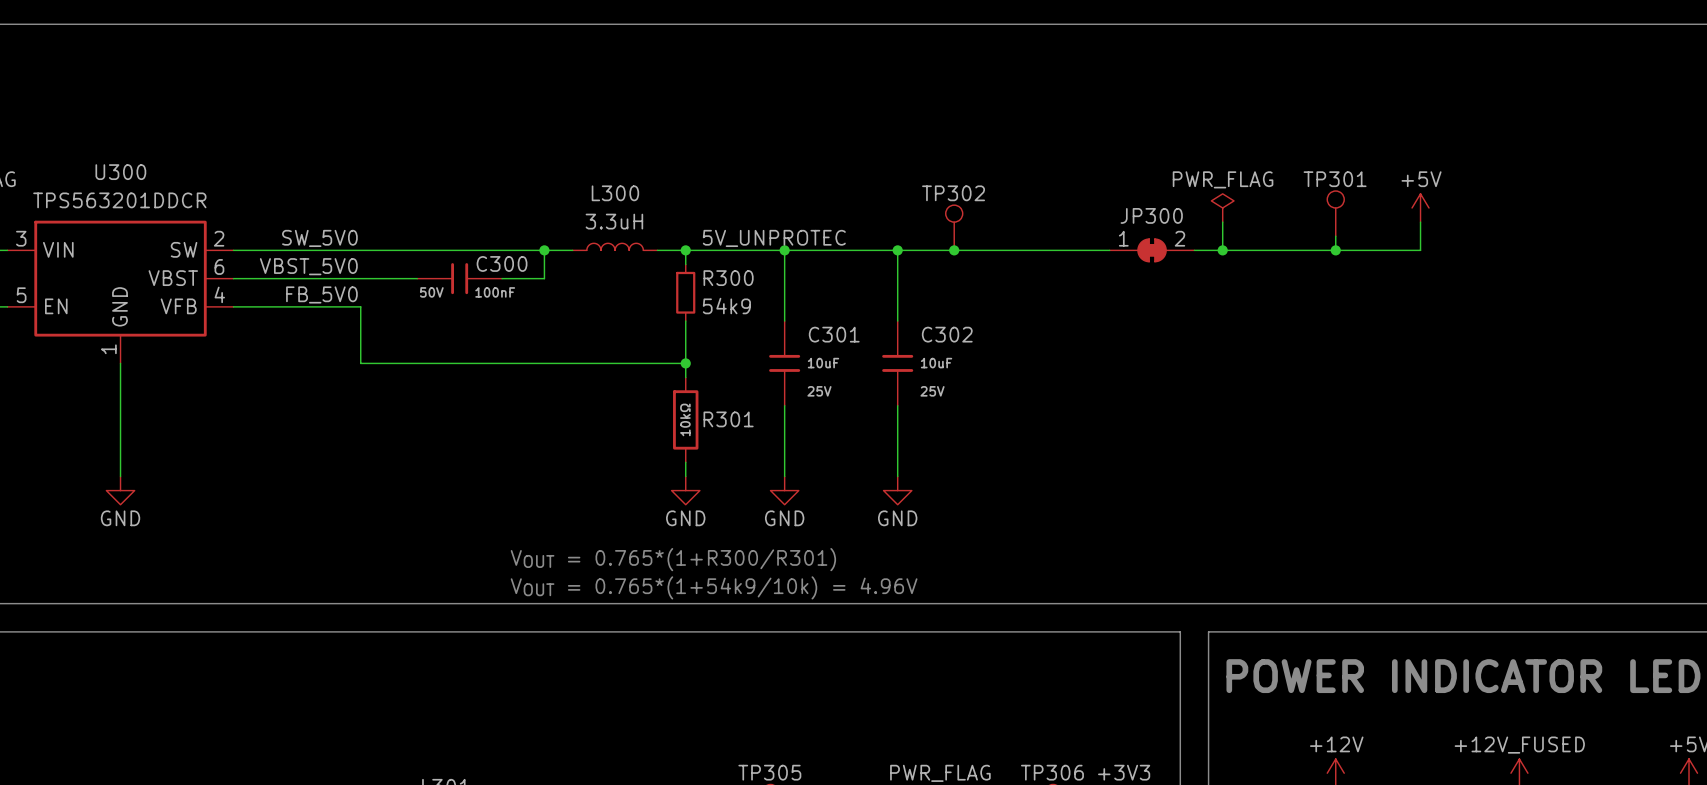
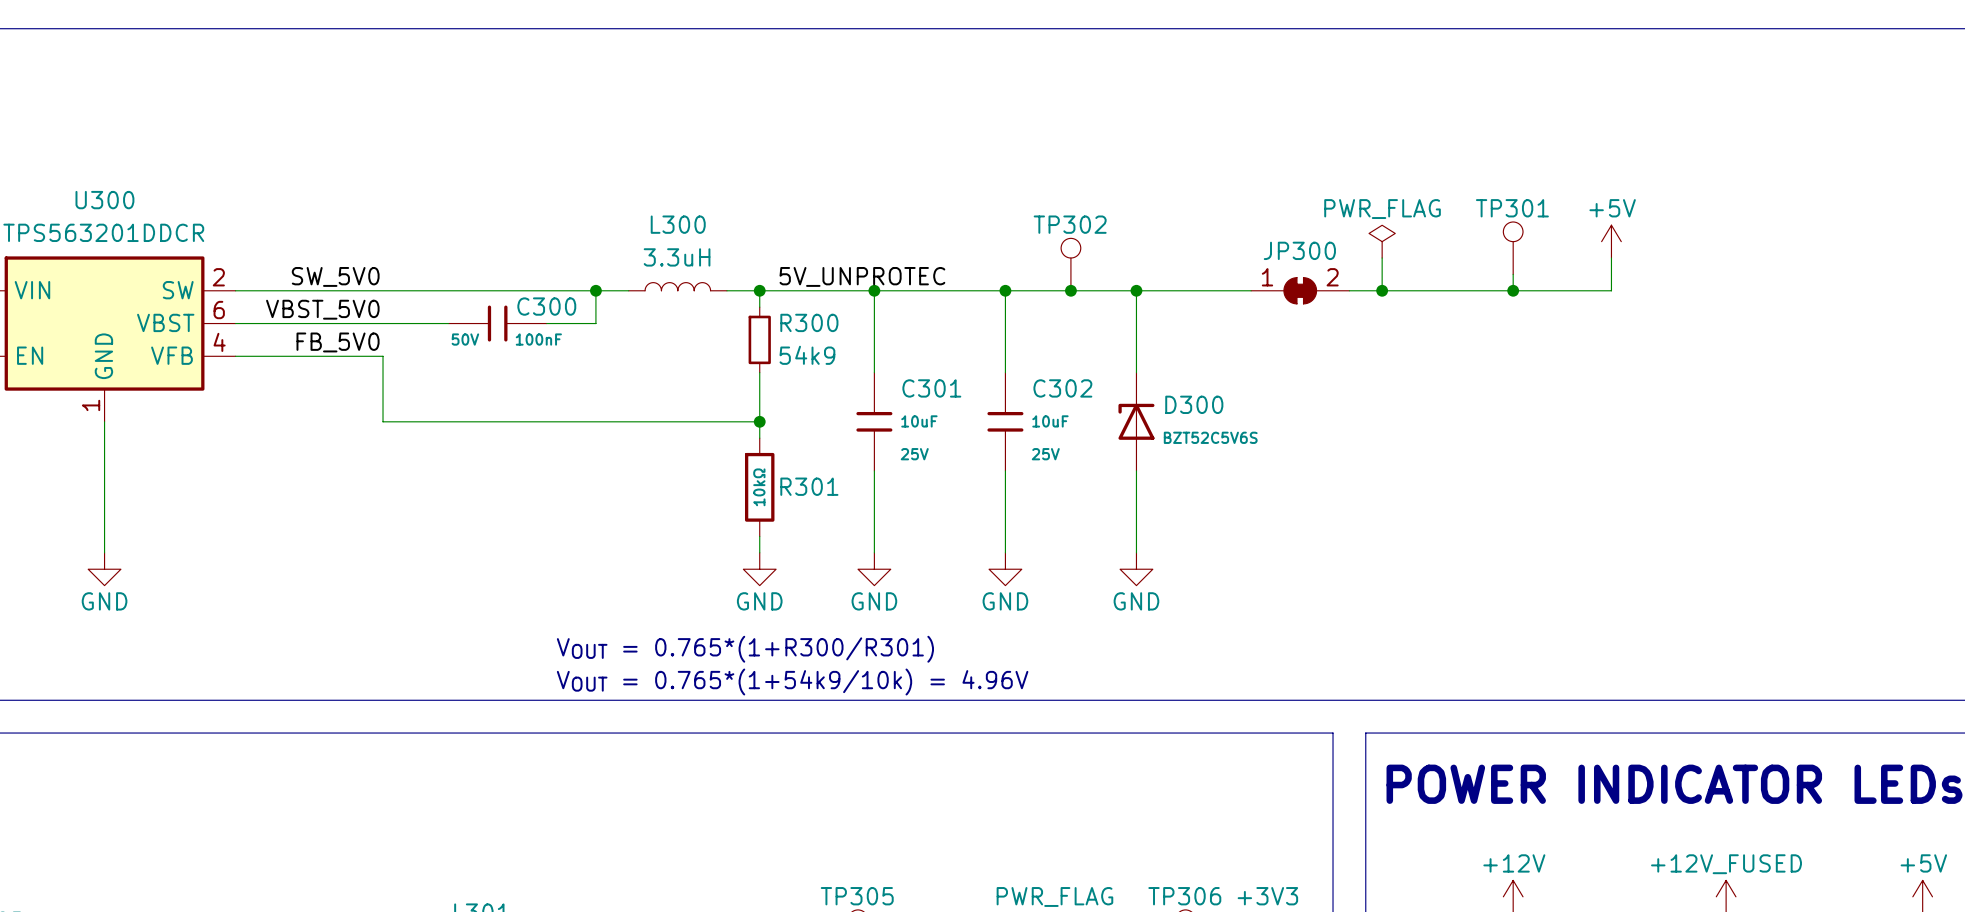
wire: none -> (1136, 290) (1136, 372)
junction: none -> (1136, 290)
D300: none -> BZT52C5V6S (1136, 421)
wire: none -> (1136, 470) (1136, 552)
power symbol: none -> GND (1136, 569)

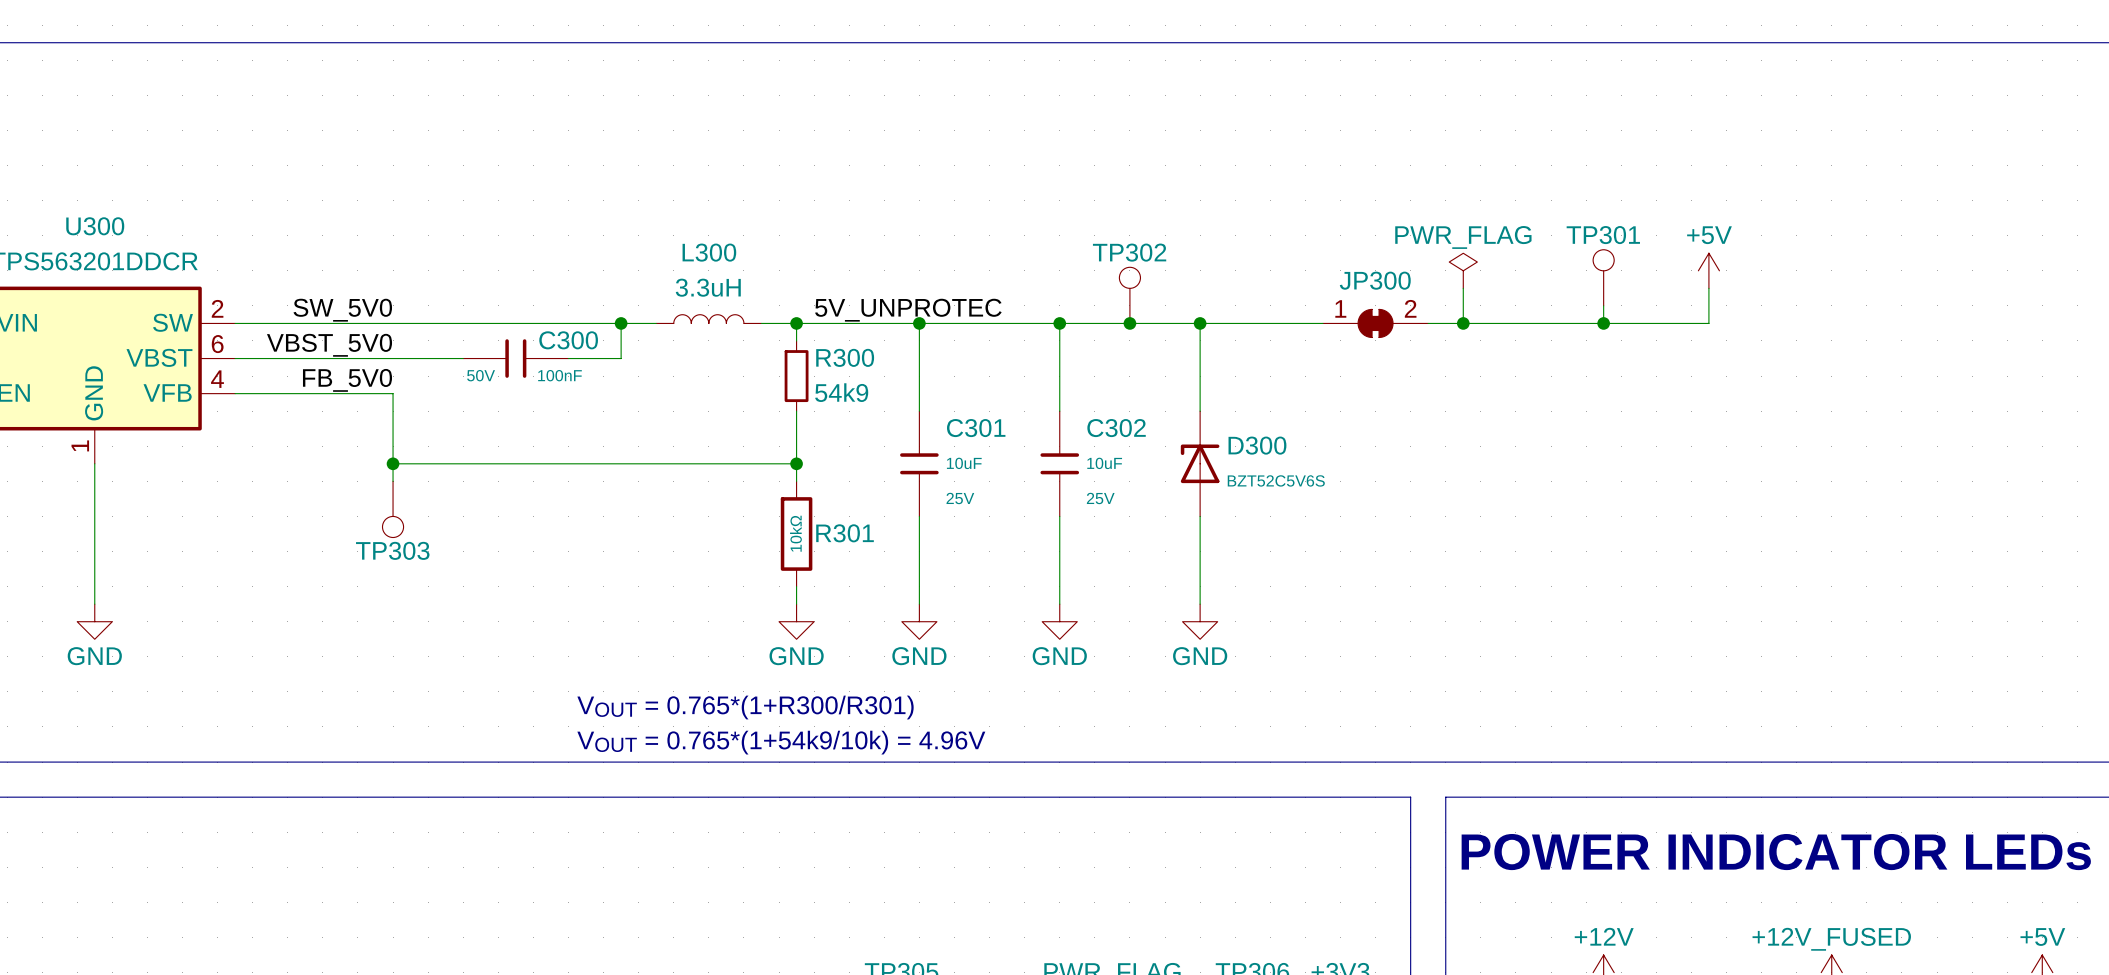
wire: none -> (393, 463) (393, 481)
junction: none -> (393, 463)
TP303: none -> (393, 509)

